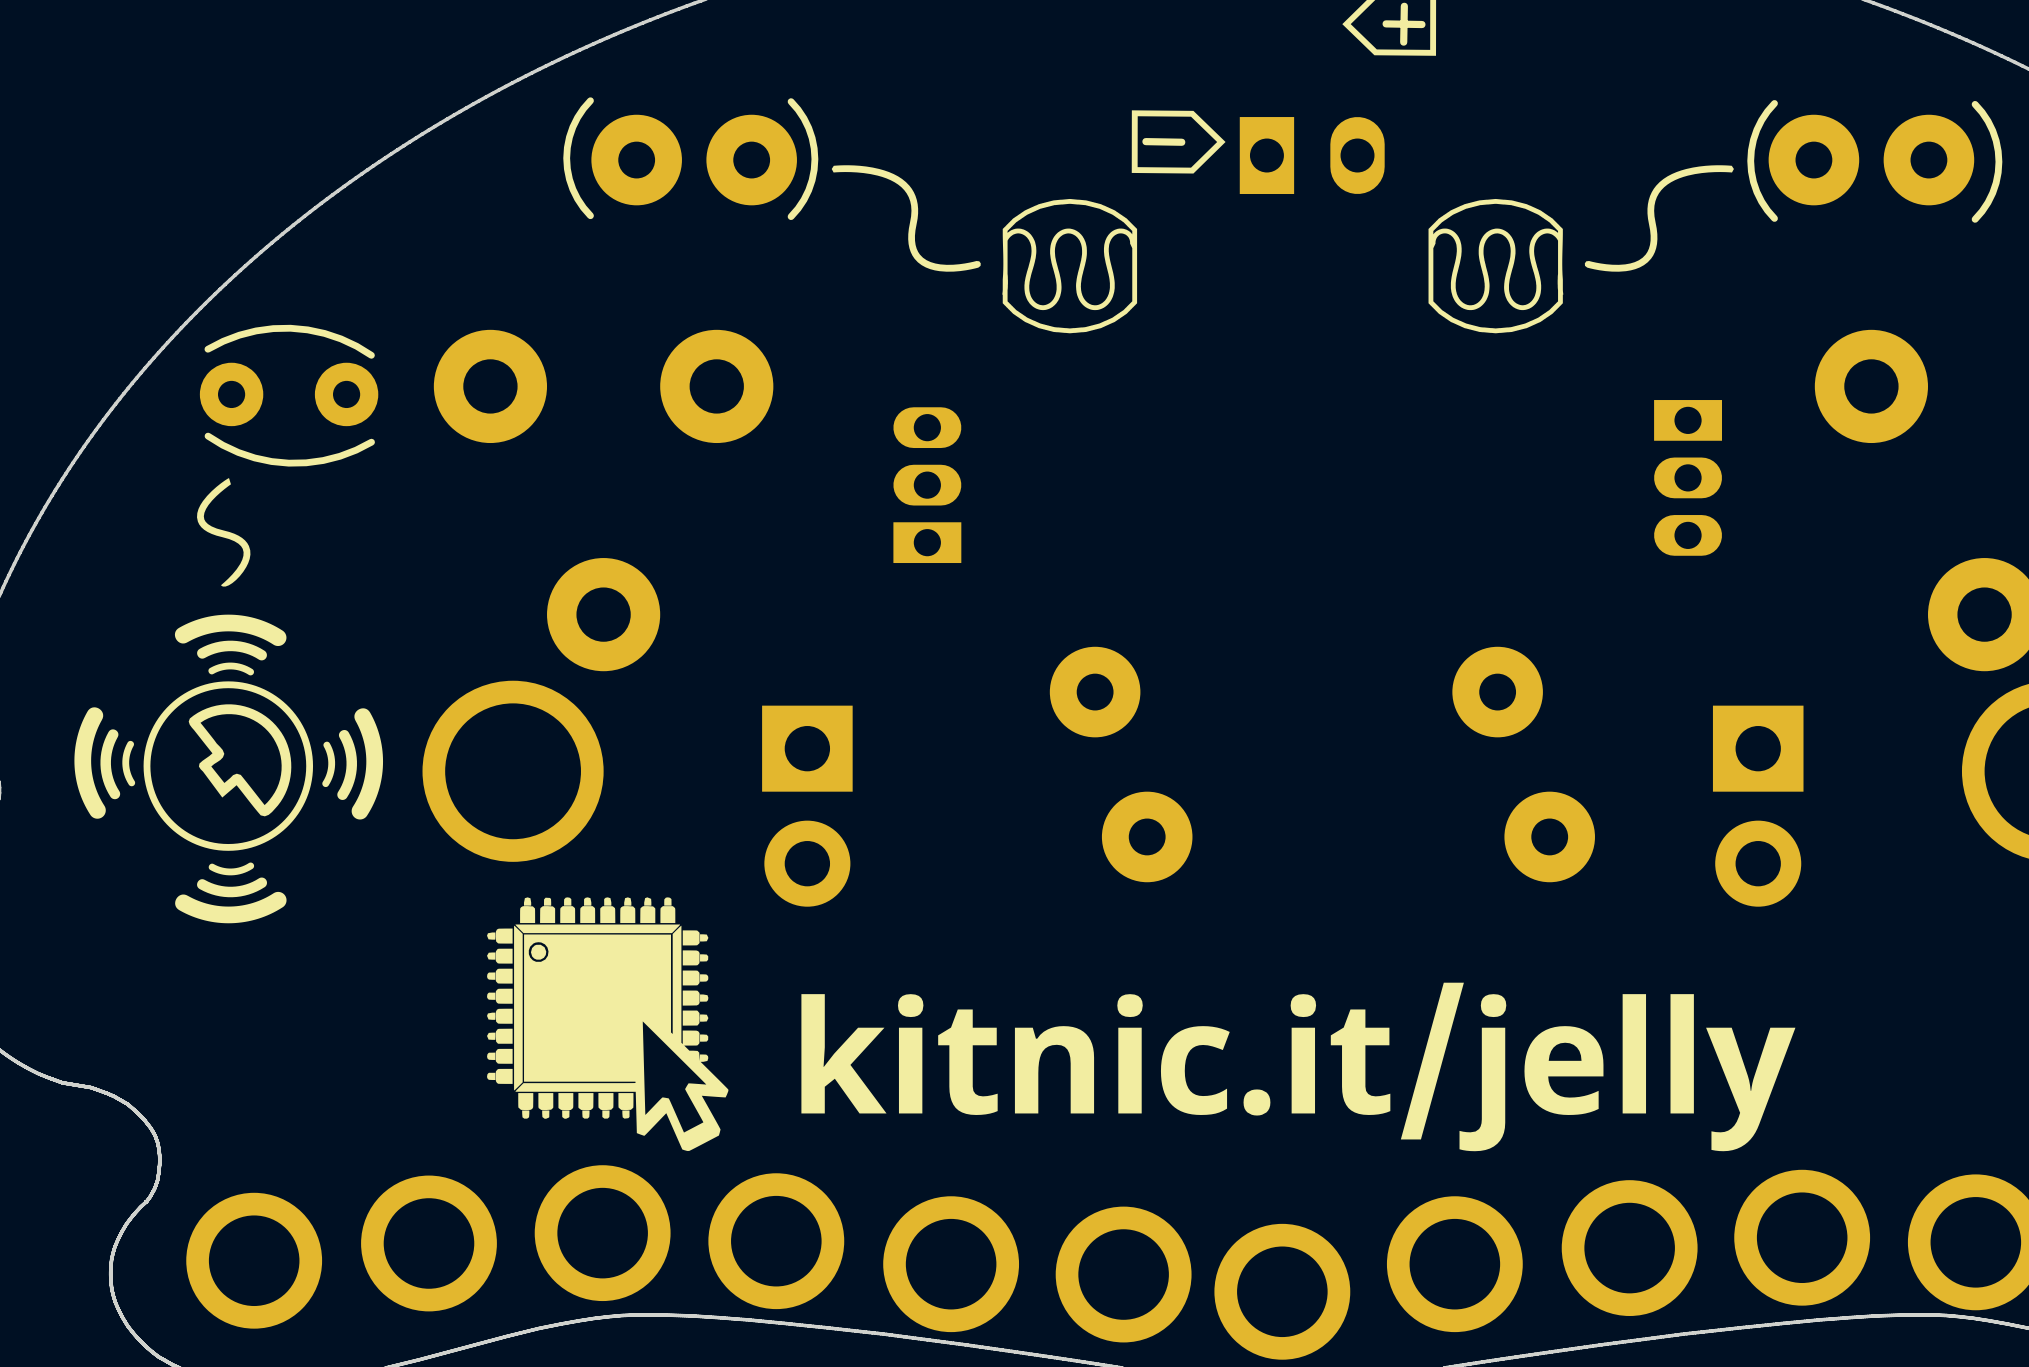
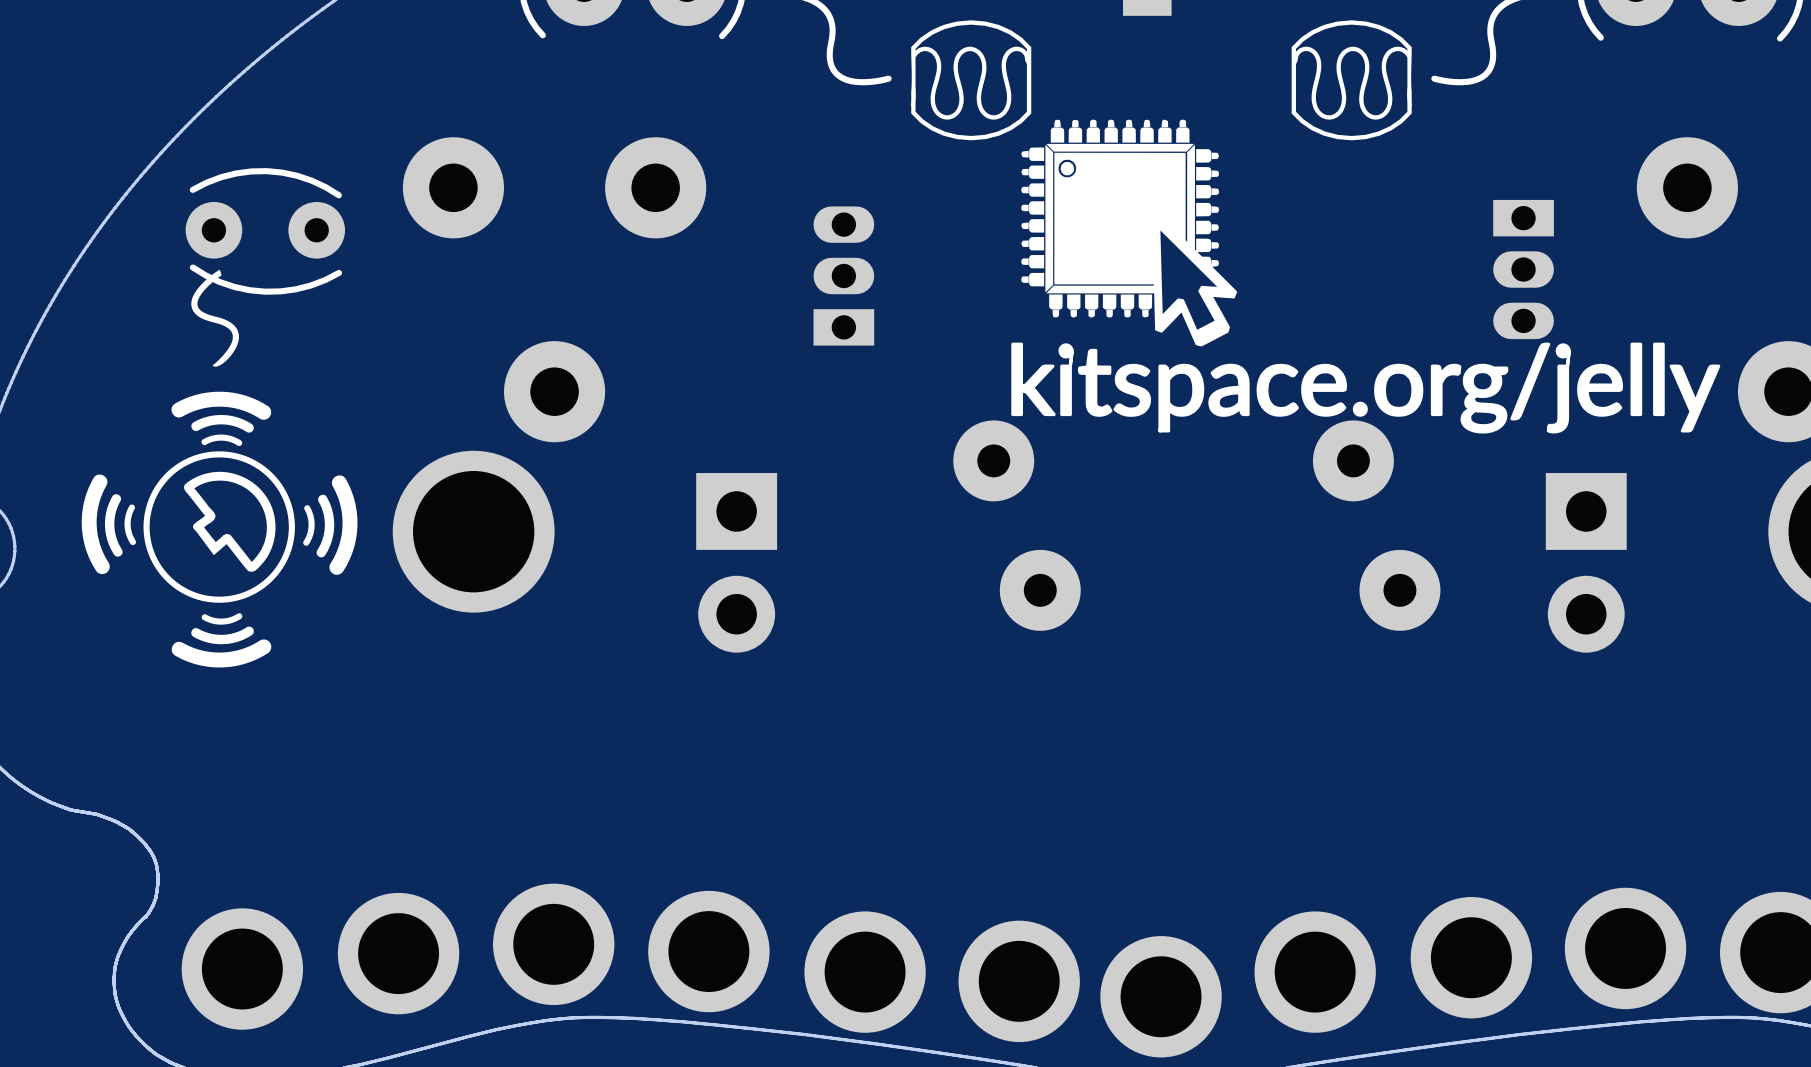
part position: (289, 395) -> (265, 231)
drawing: none -> [1011, 342, 1721, 434]
drawing: [801, 982, 1796, 1152] -> none
drawing position: (607, 1024) -> (1129, 232)

